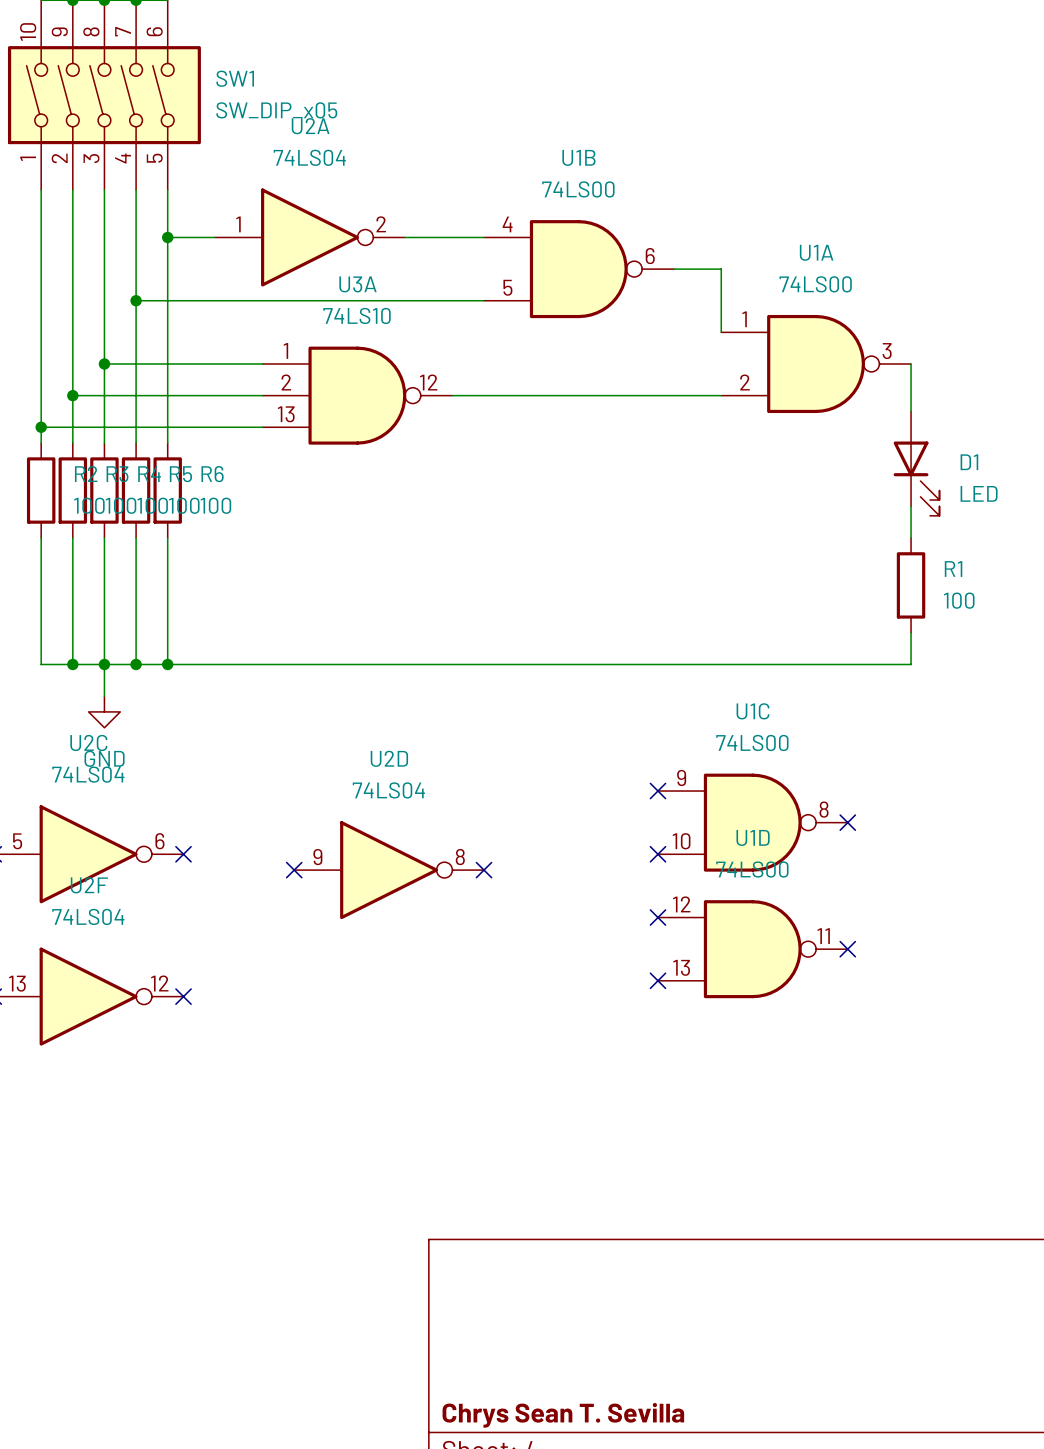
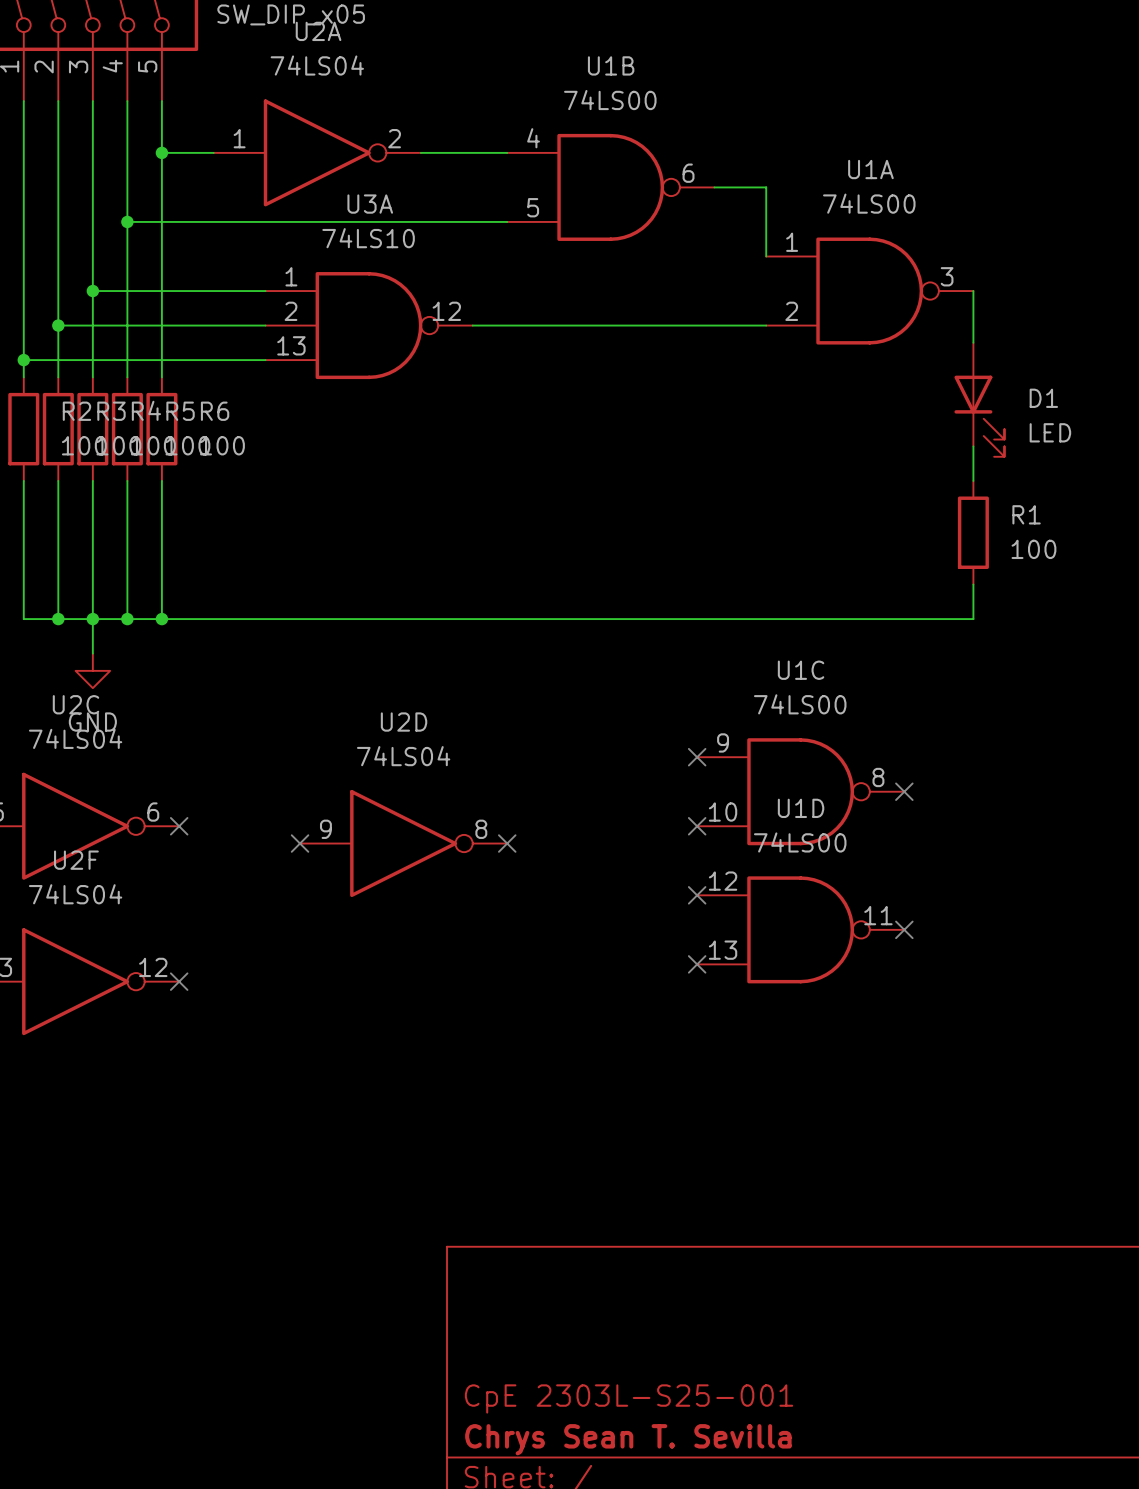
title block: none -> CpE 2303L-S25-001 (628, 1398)

